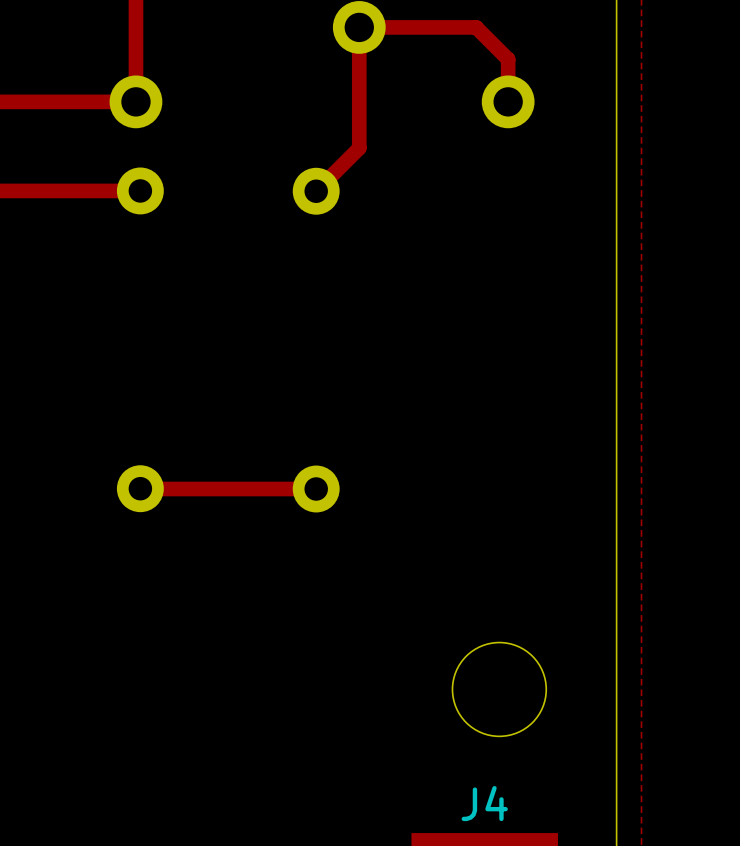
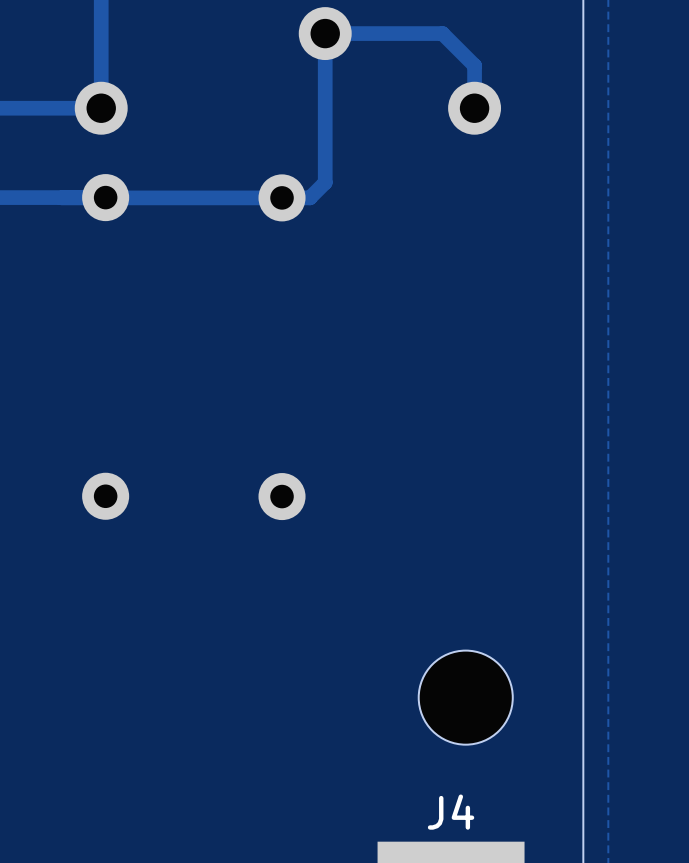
track: (359, 148) (316, 191) -> (325, 154) (325, 182) (309, 197) (61, 197)
track: (140, 489) (316, 489) -> none

